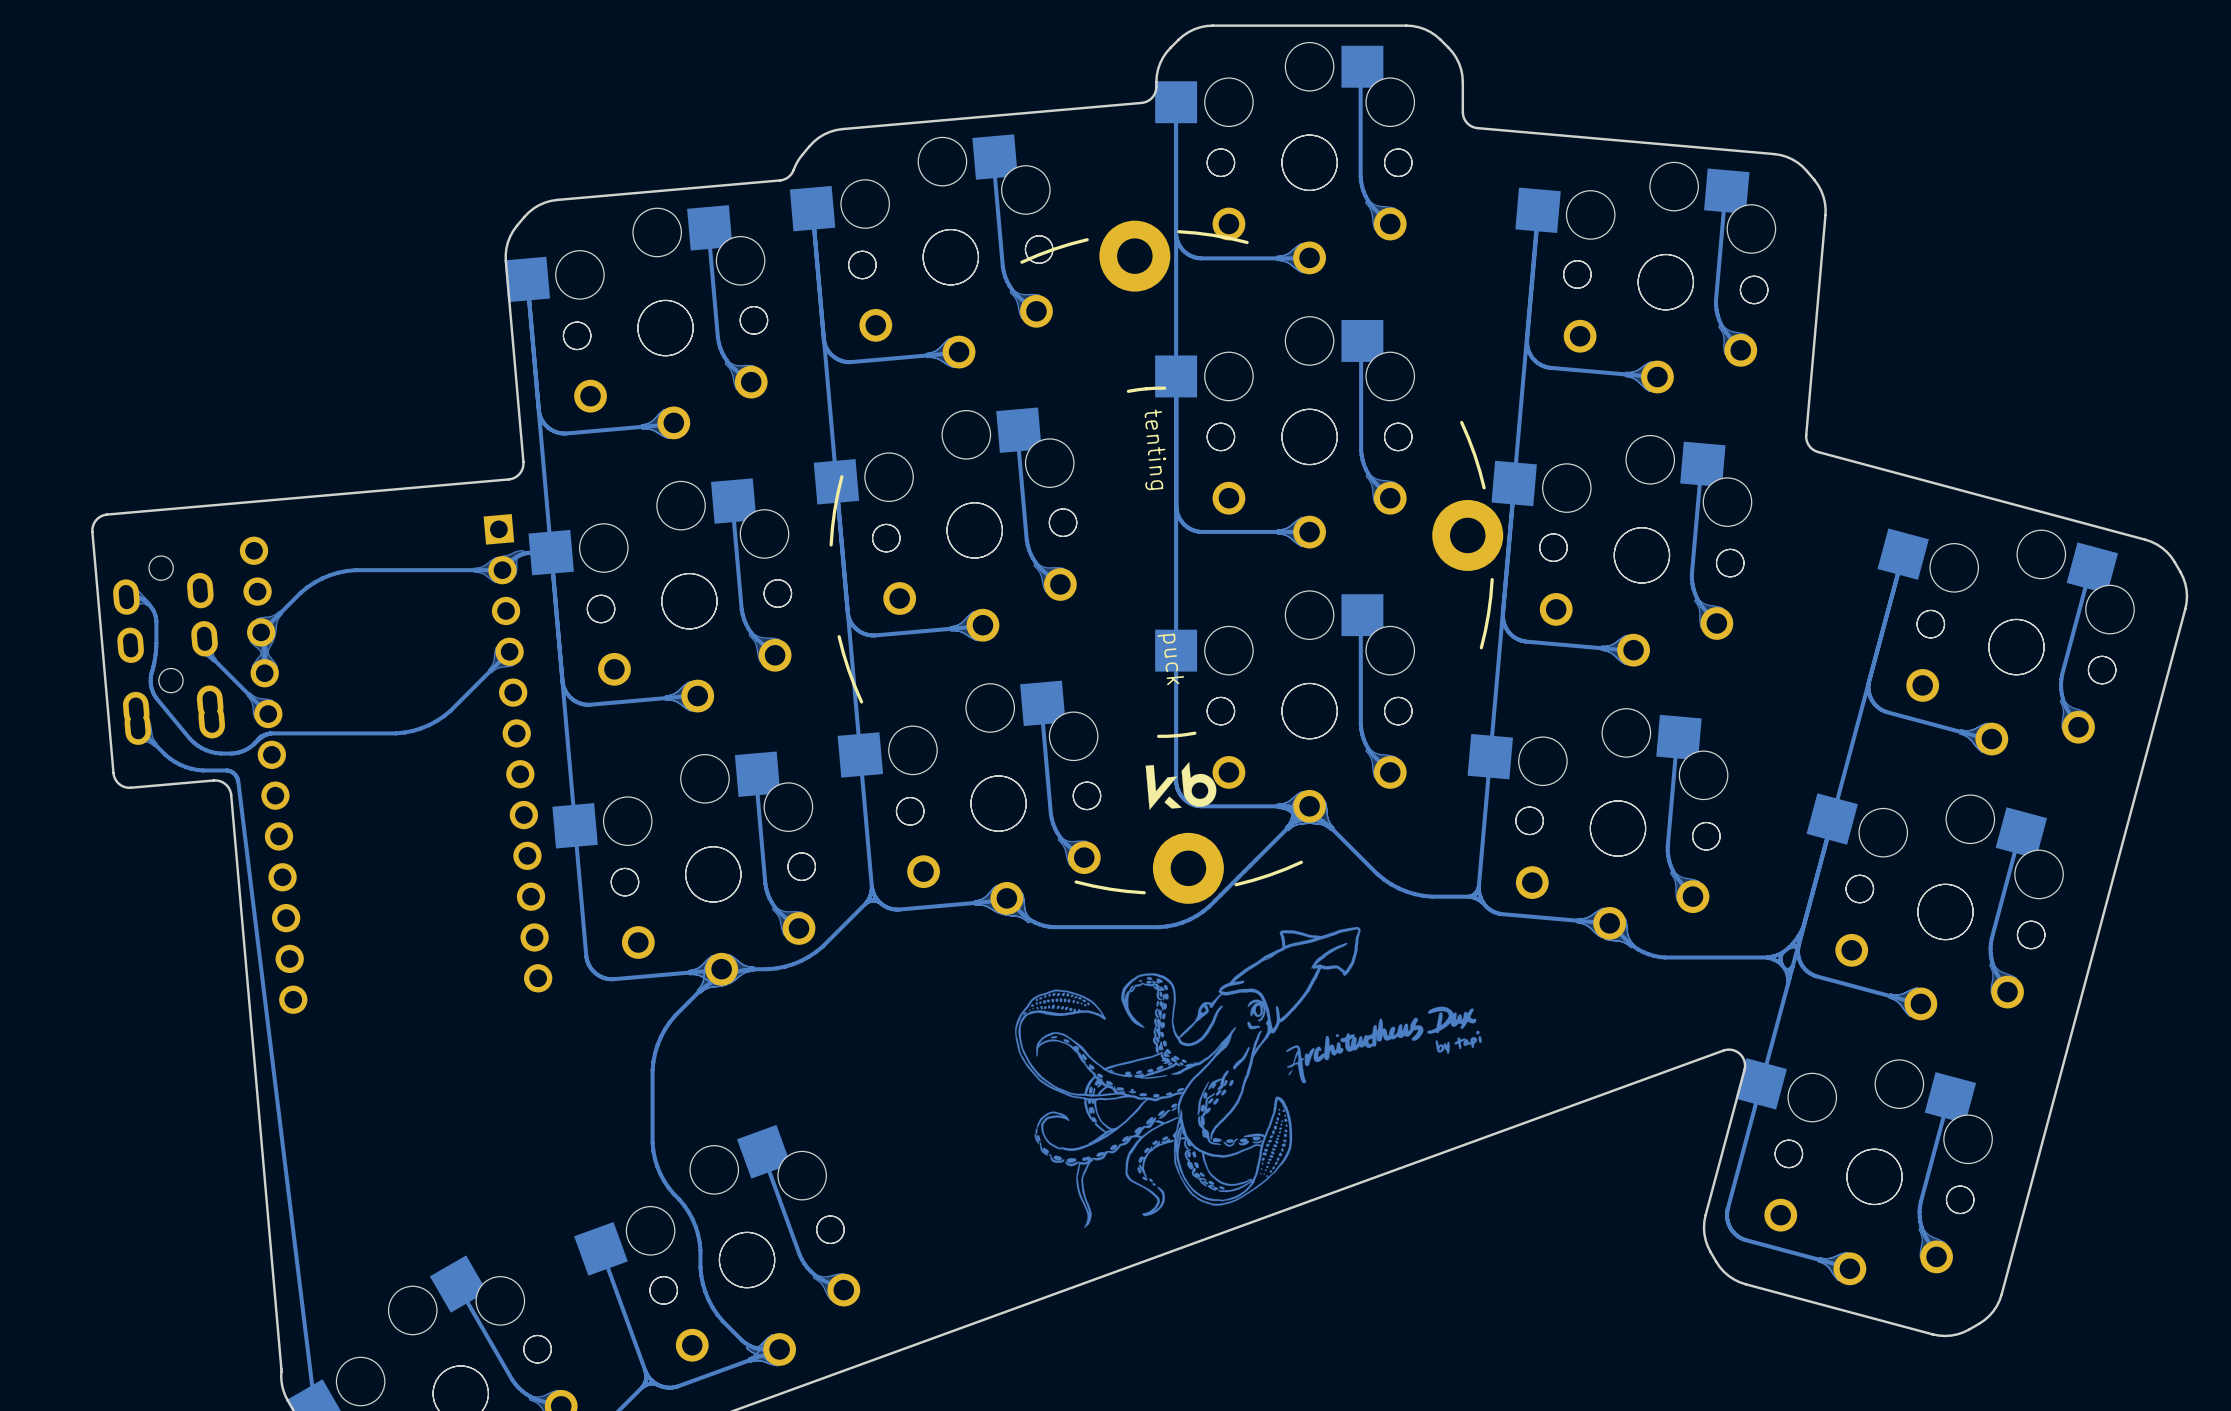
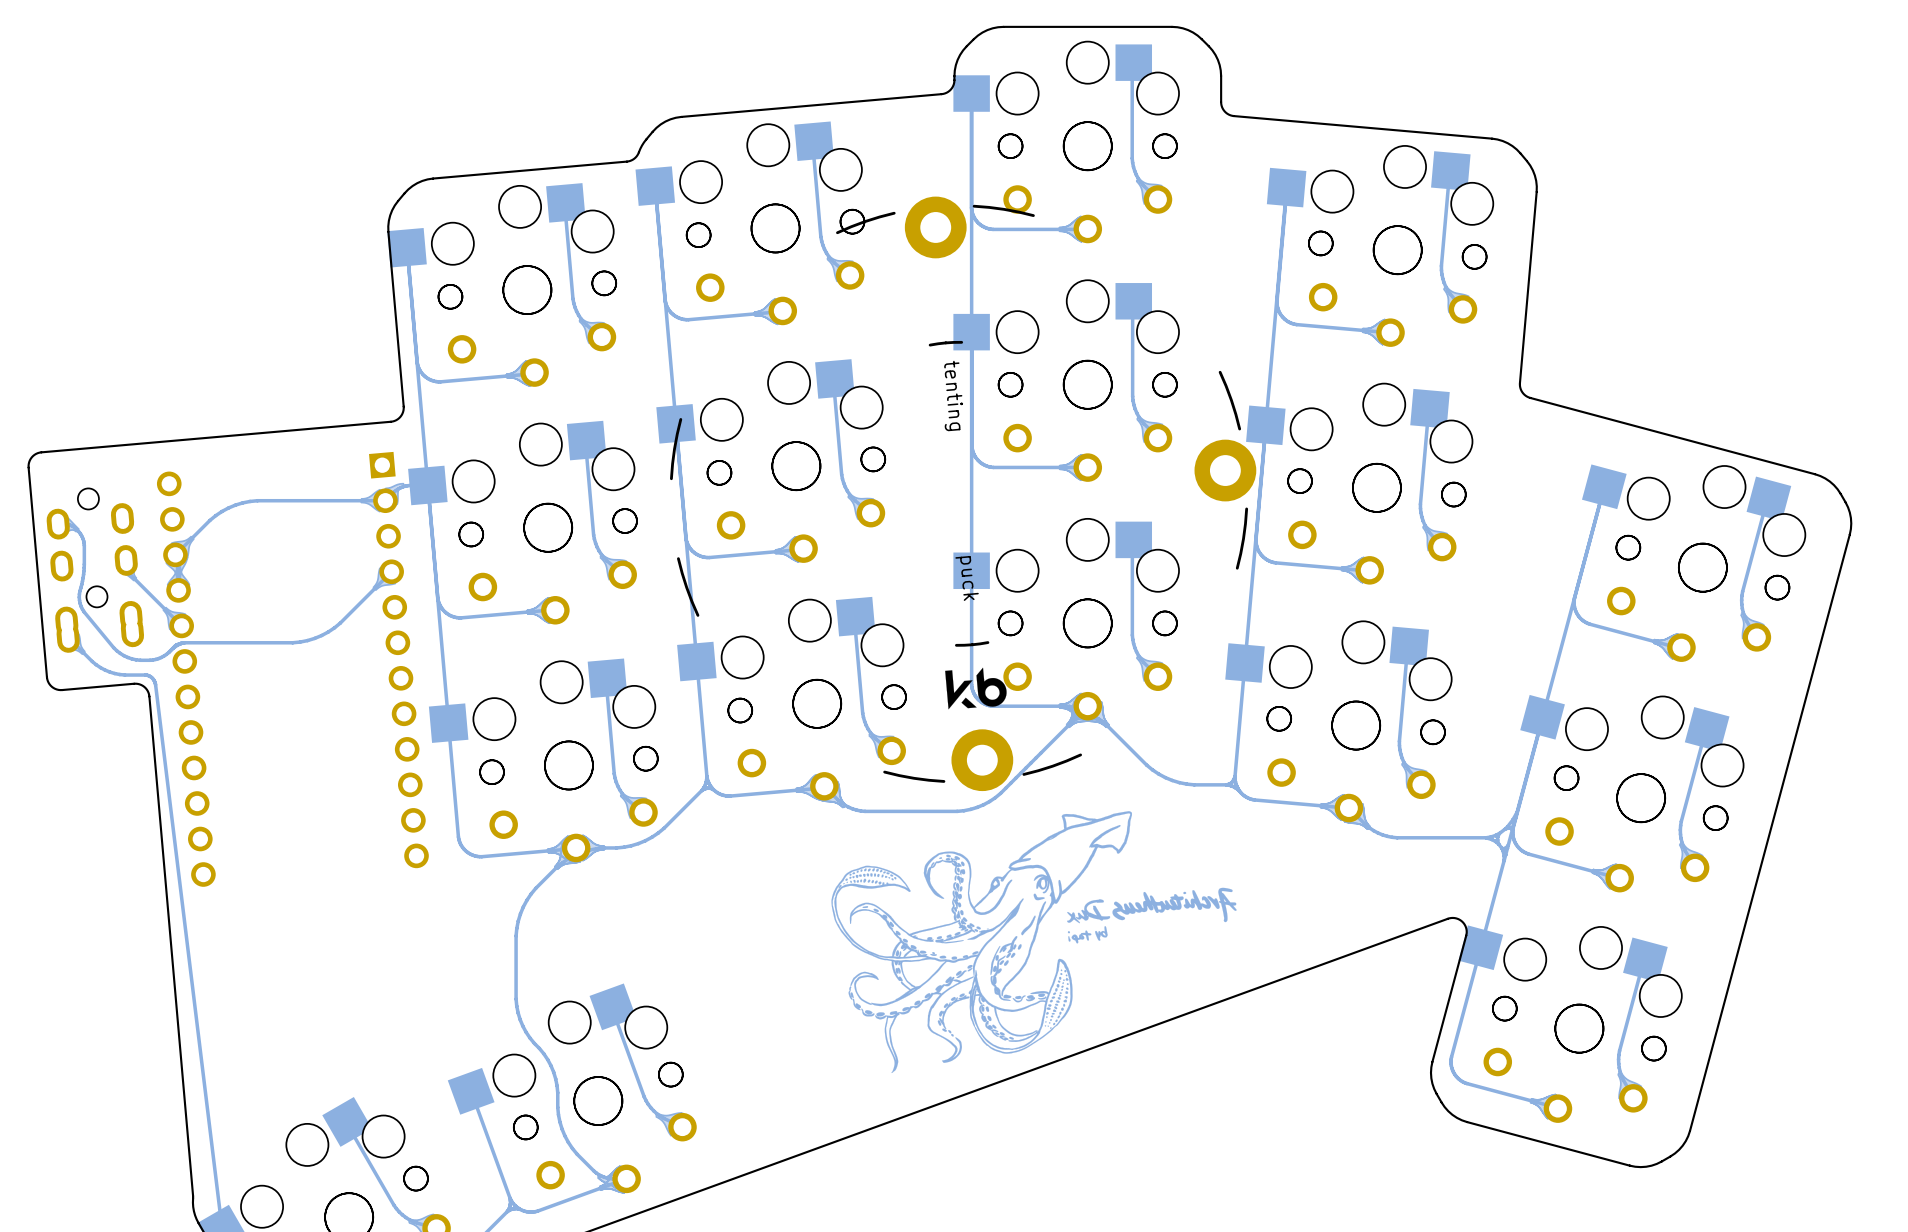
drawing shape: [1015, 926, 1482, 1228] -> [831, 811, 1237, 1074]

